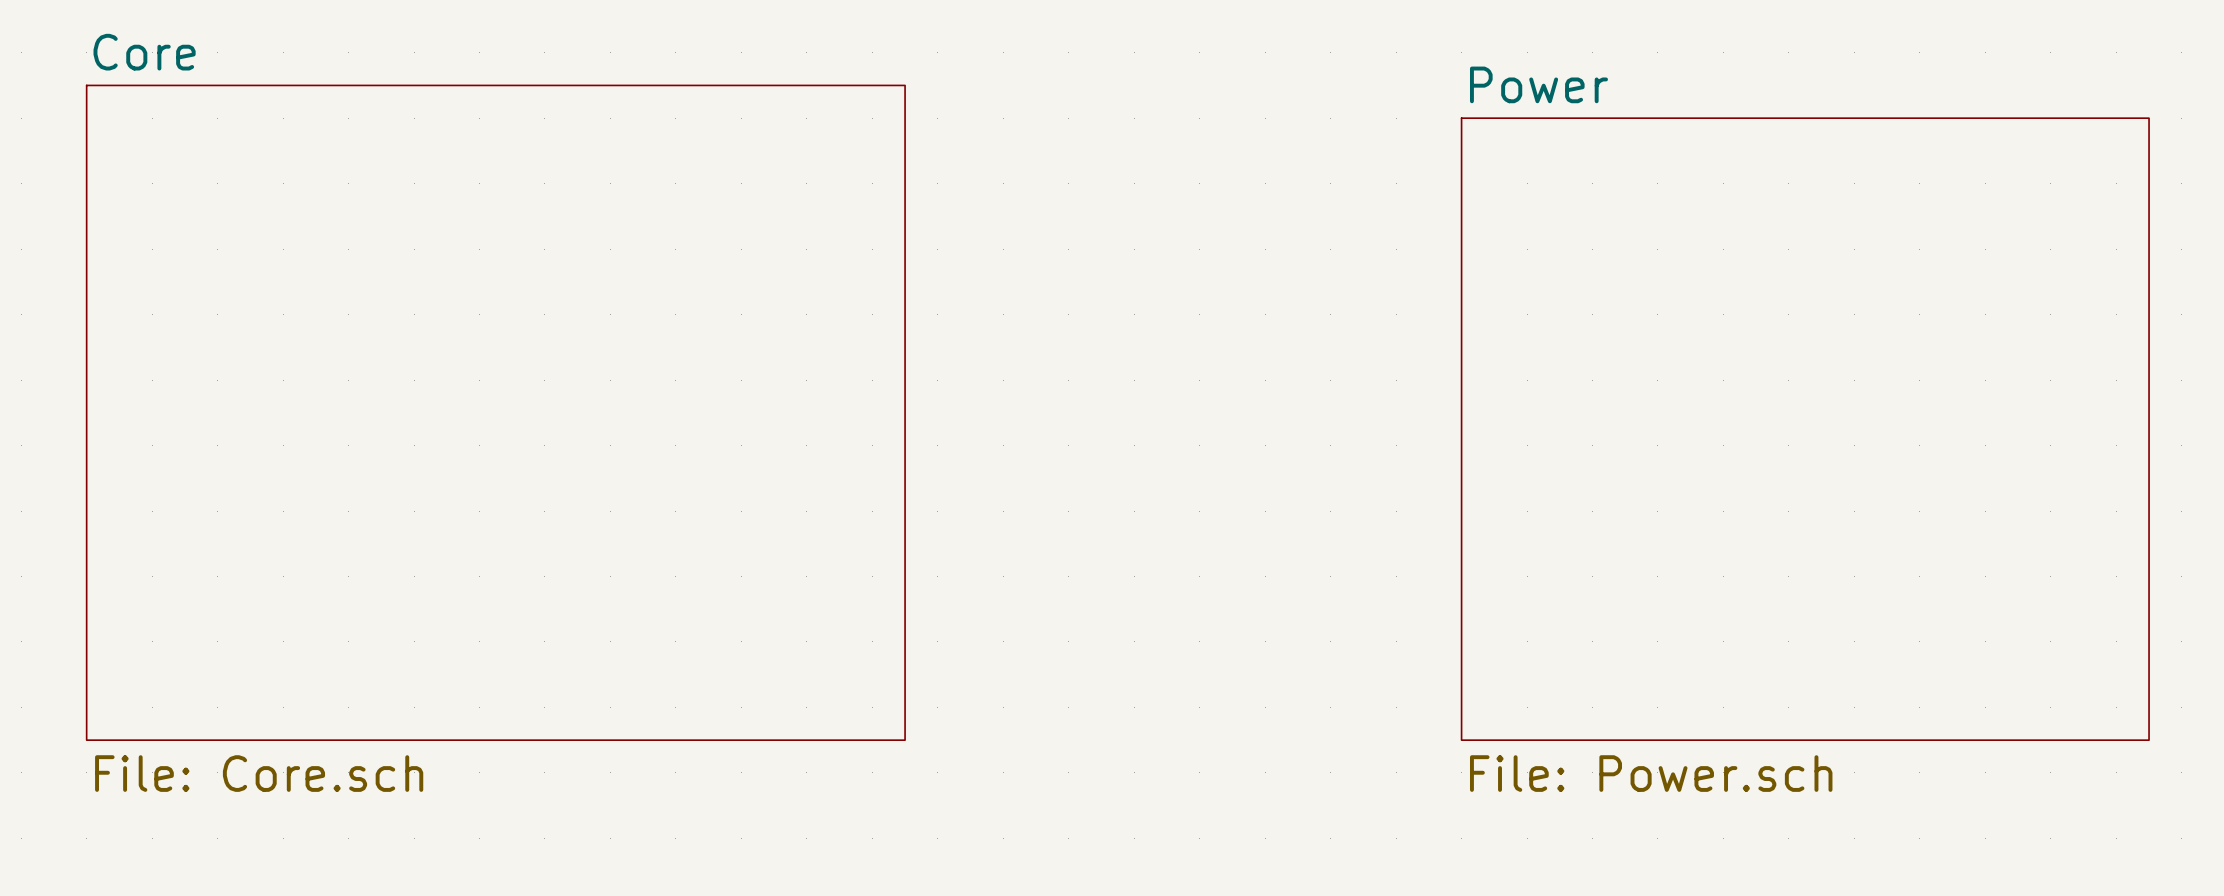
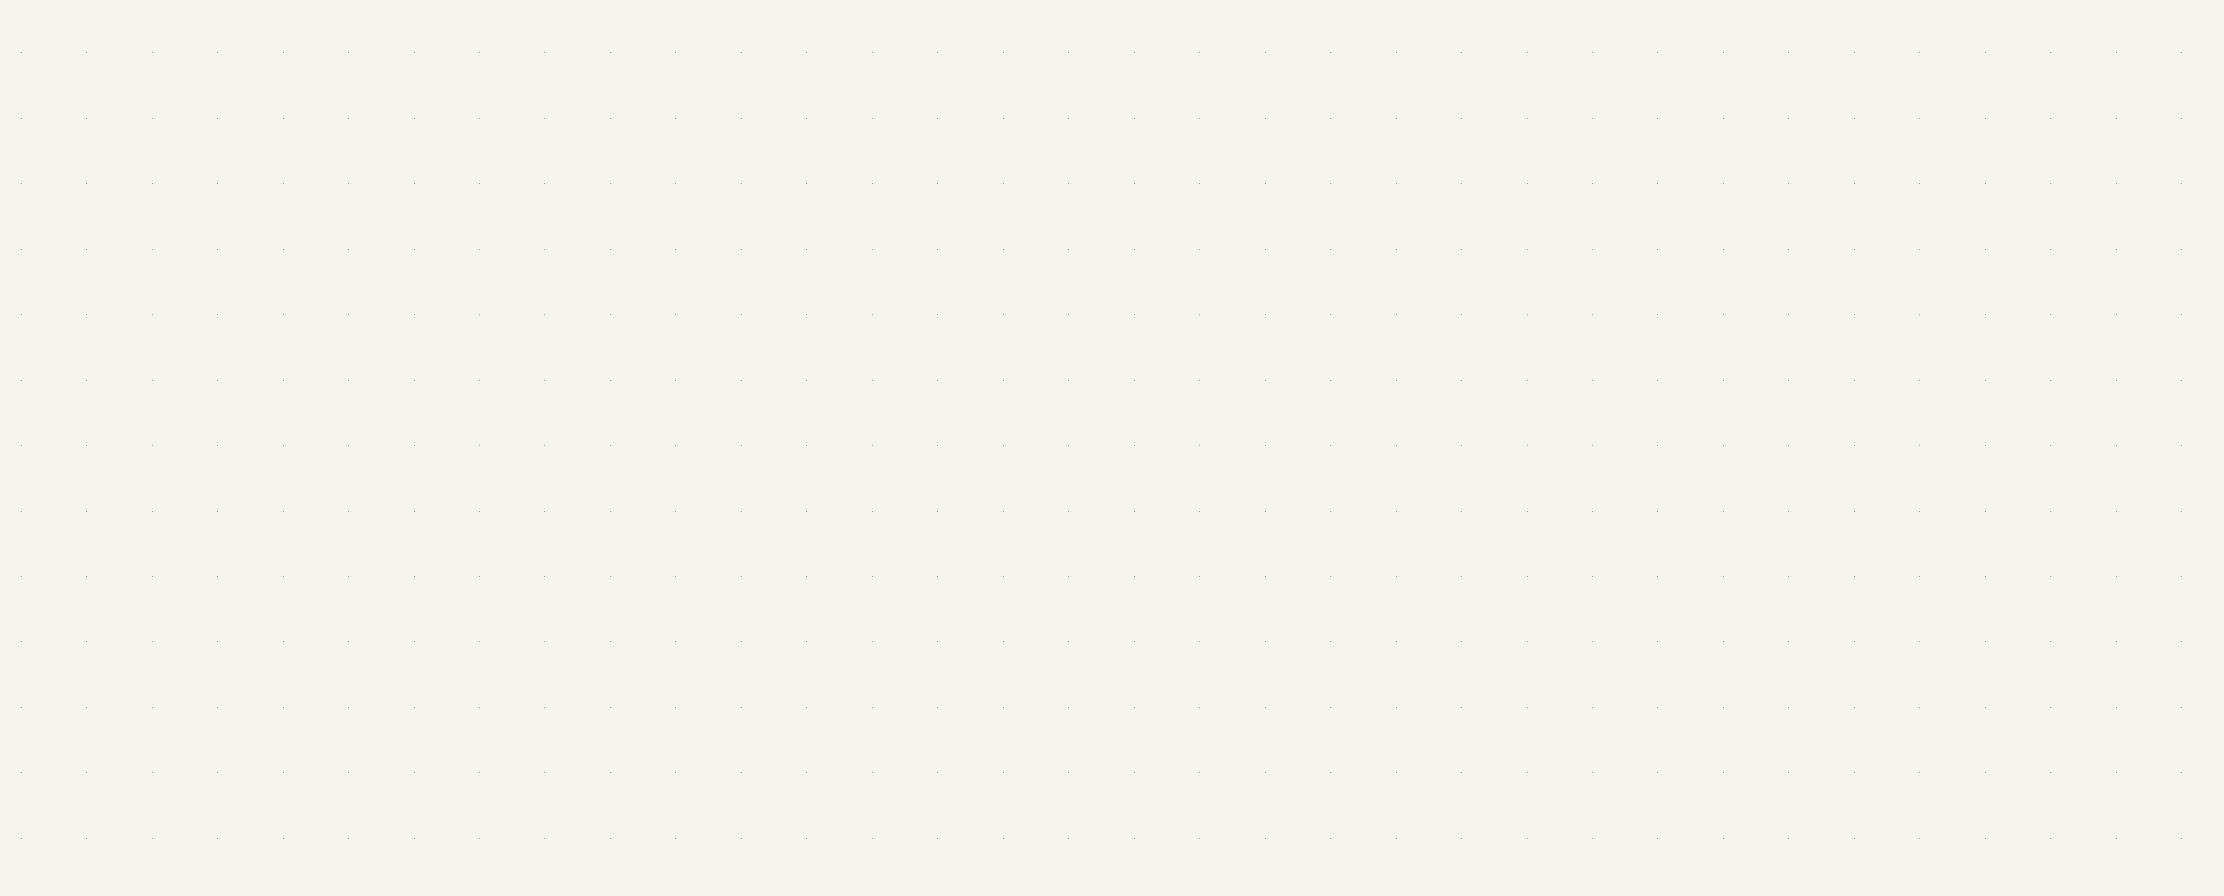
sheet Core: File: Core.sch (495, 412) -> none
sheet Power: File: Power.sch (1805, 429) -> none

